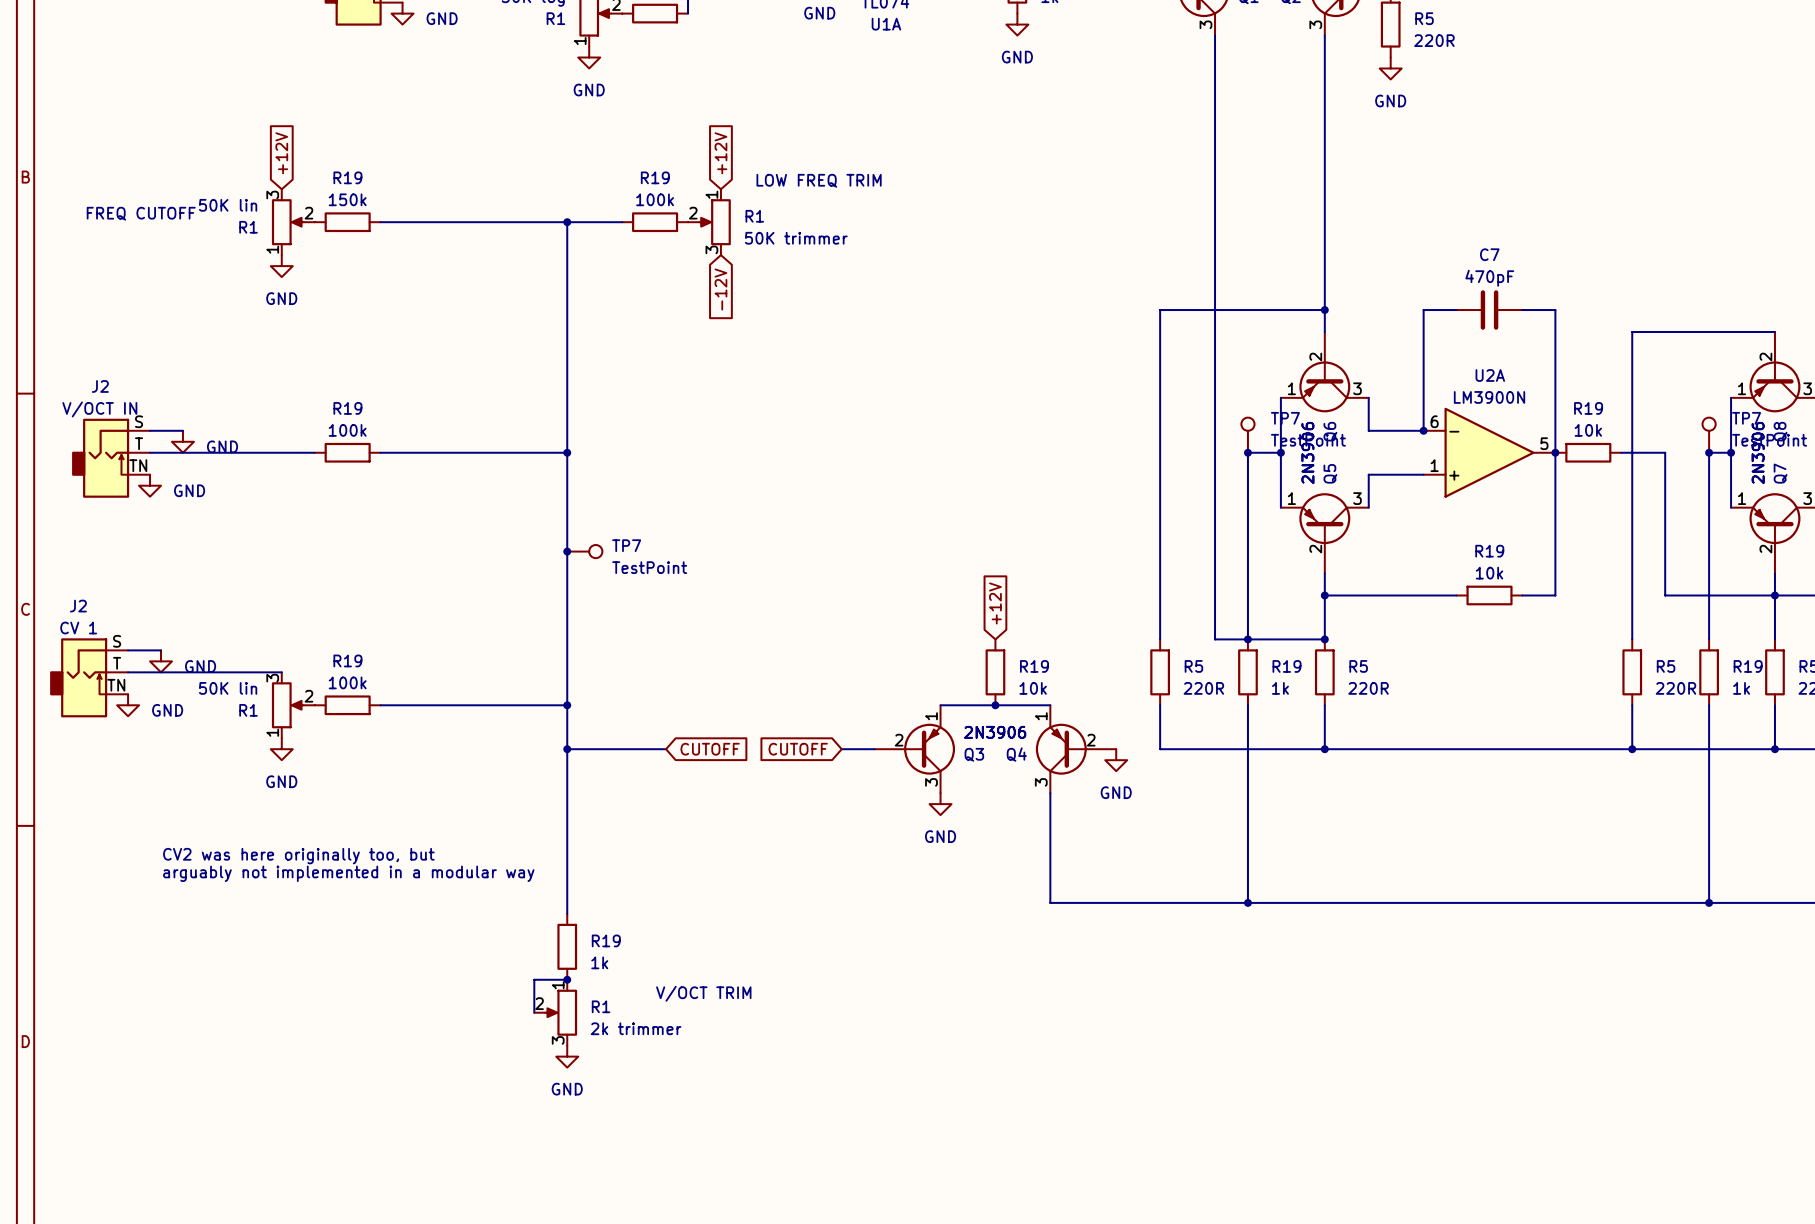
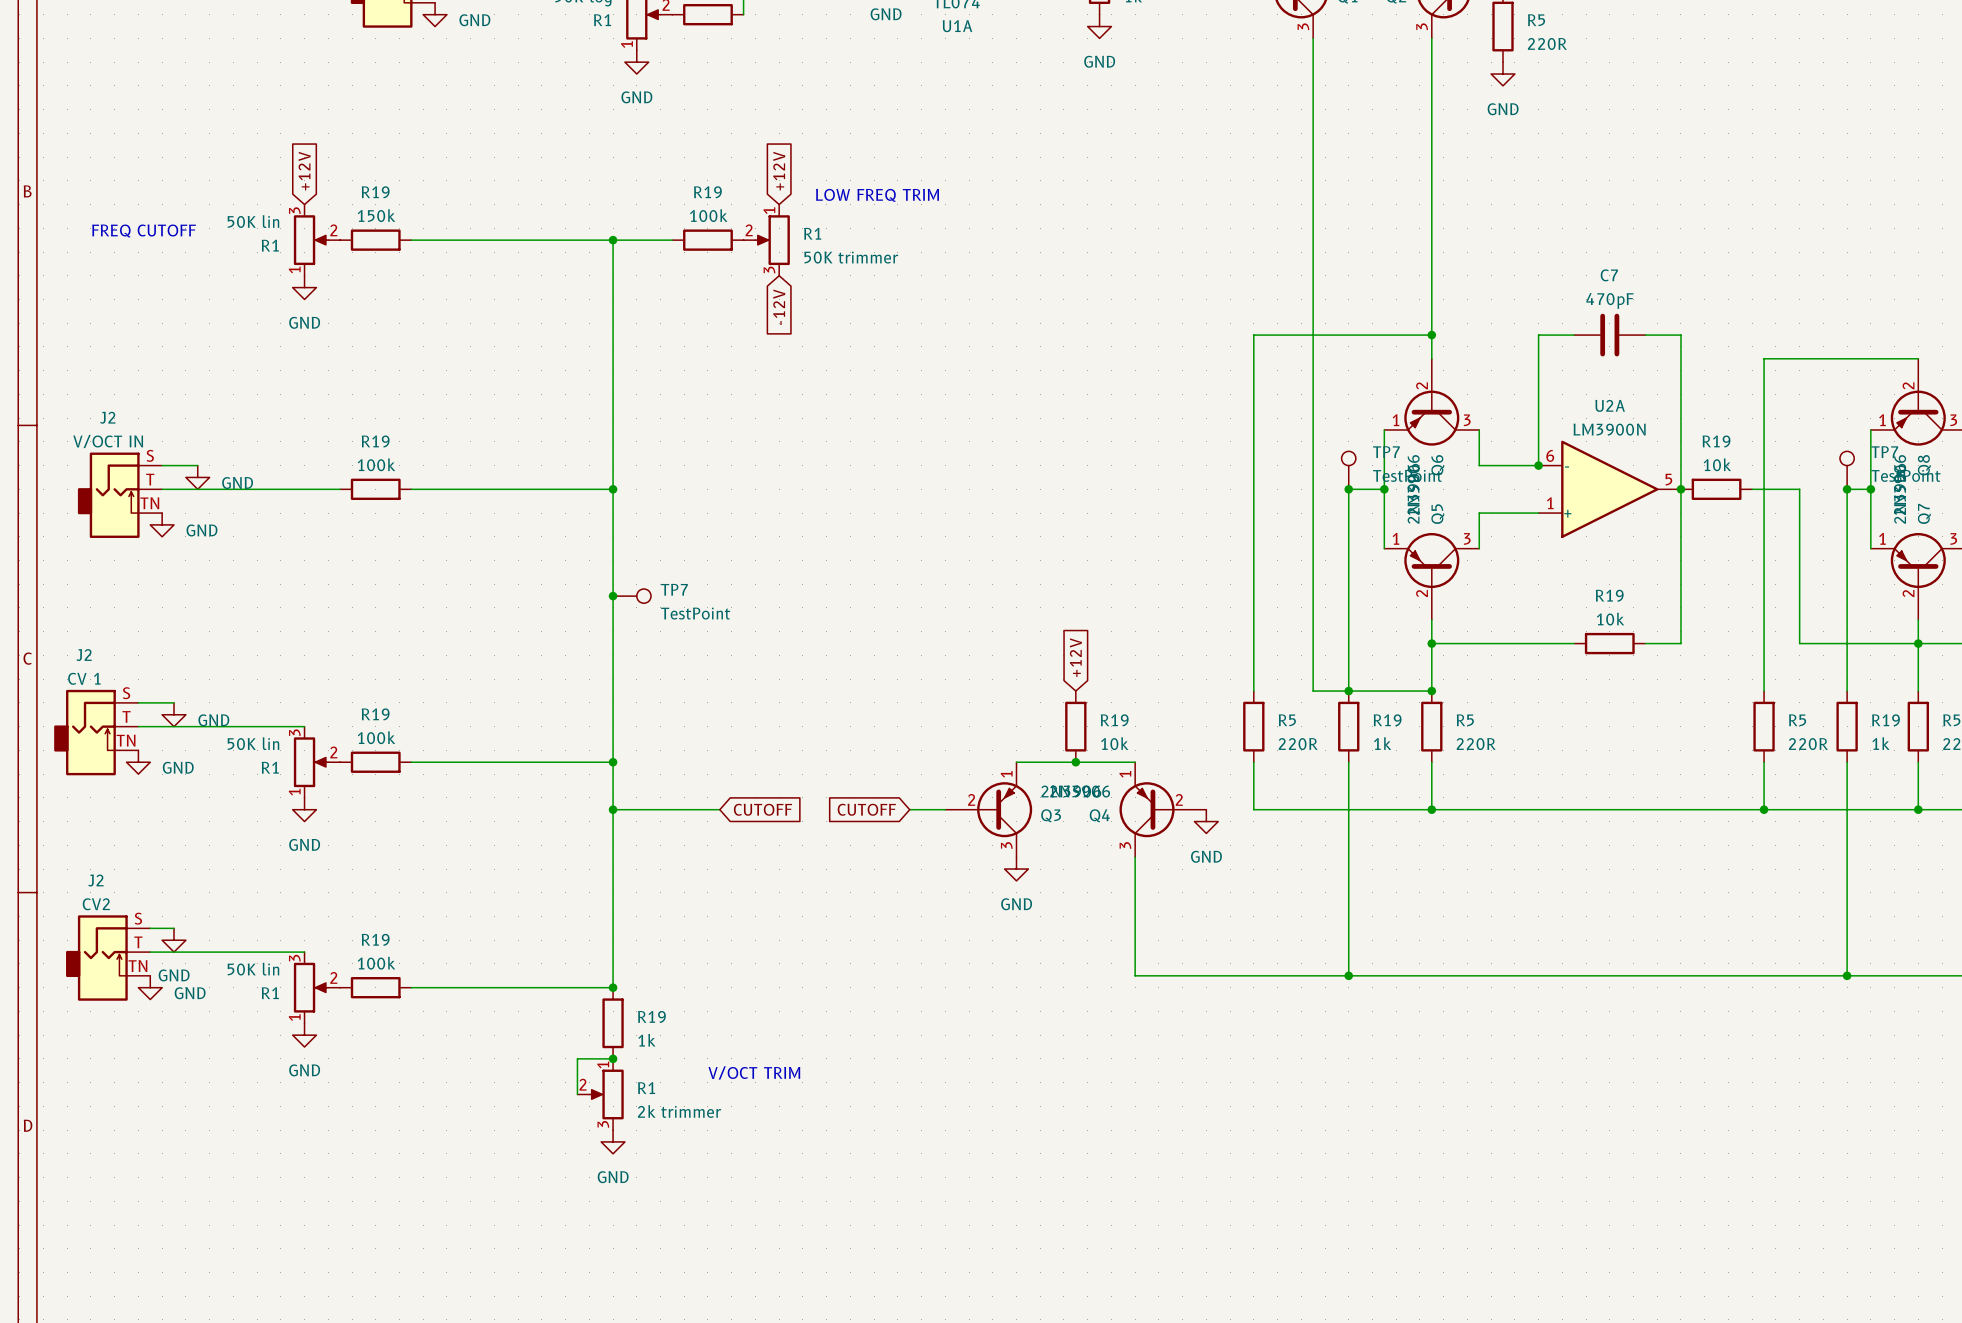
text: CV2 was here originally too, but (298, 856) -> none
wire: none -> (150, 928) (174, 928)
power symbol: none -> GND (174, 940)
text: arguably not implemented in a modular way (348, 873) -> none
wire: none -> (150, 952) (304, 952)
J2: none -> CV2 (108, 958)
power symbol: none -> GND (150, 987)
R1: none -> 50K lin (316, 987)
R19: none -> 100k (375, 987)
wire: none -> (411, 987) (613, 987)
junction: none -> (613, 987)
power symbol: none -> GND (304, 1035)

